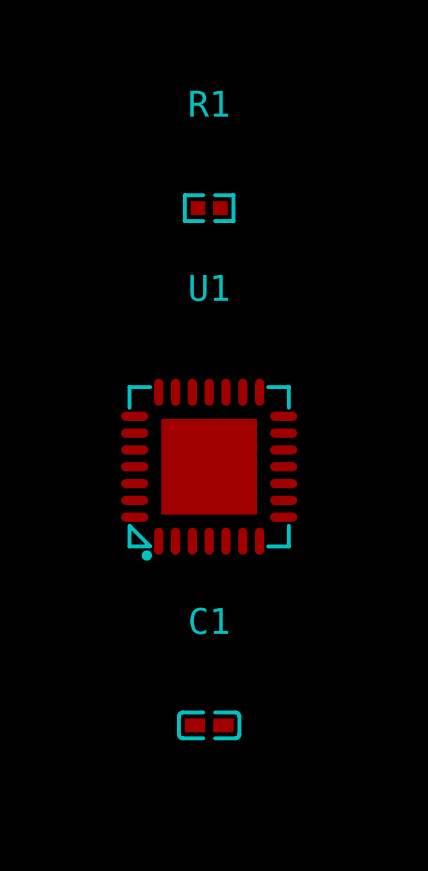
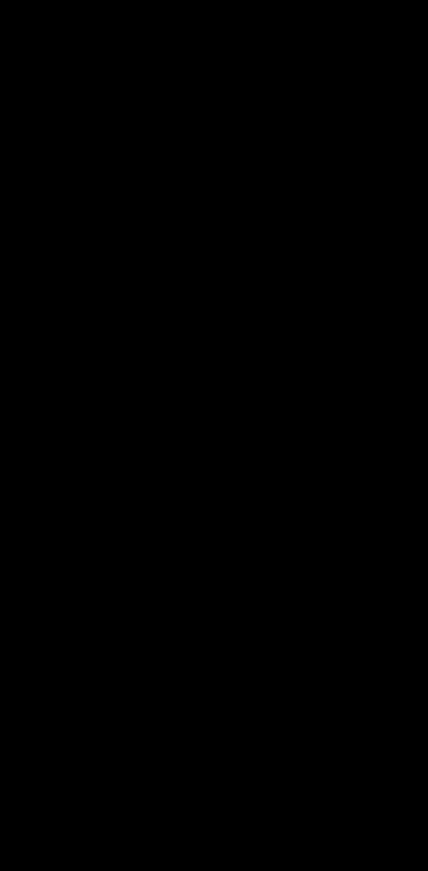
R1: (209, 208) -> none
U1: (209, 469) -> none
C1: (209, 725) -> none

